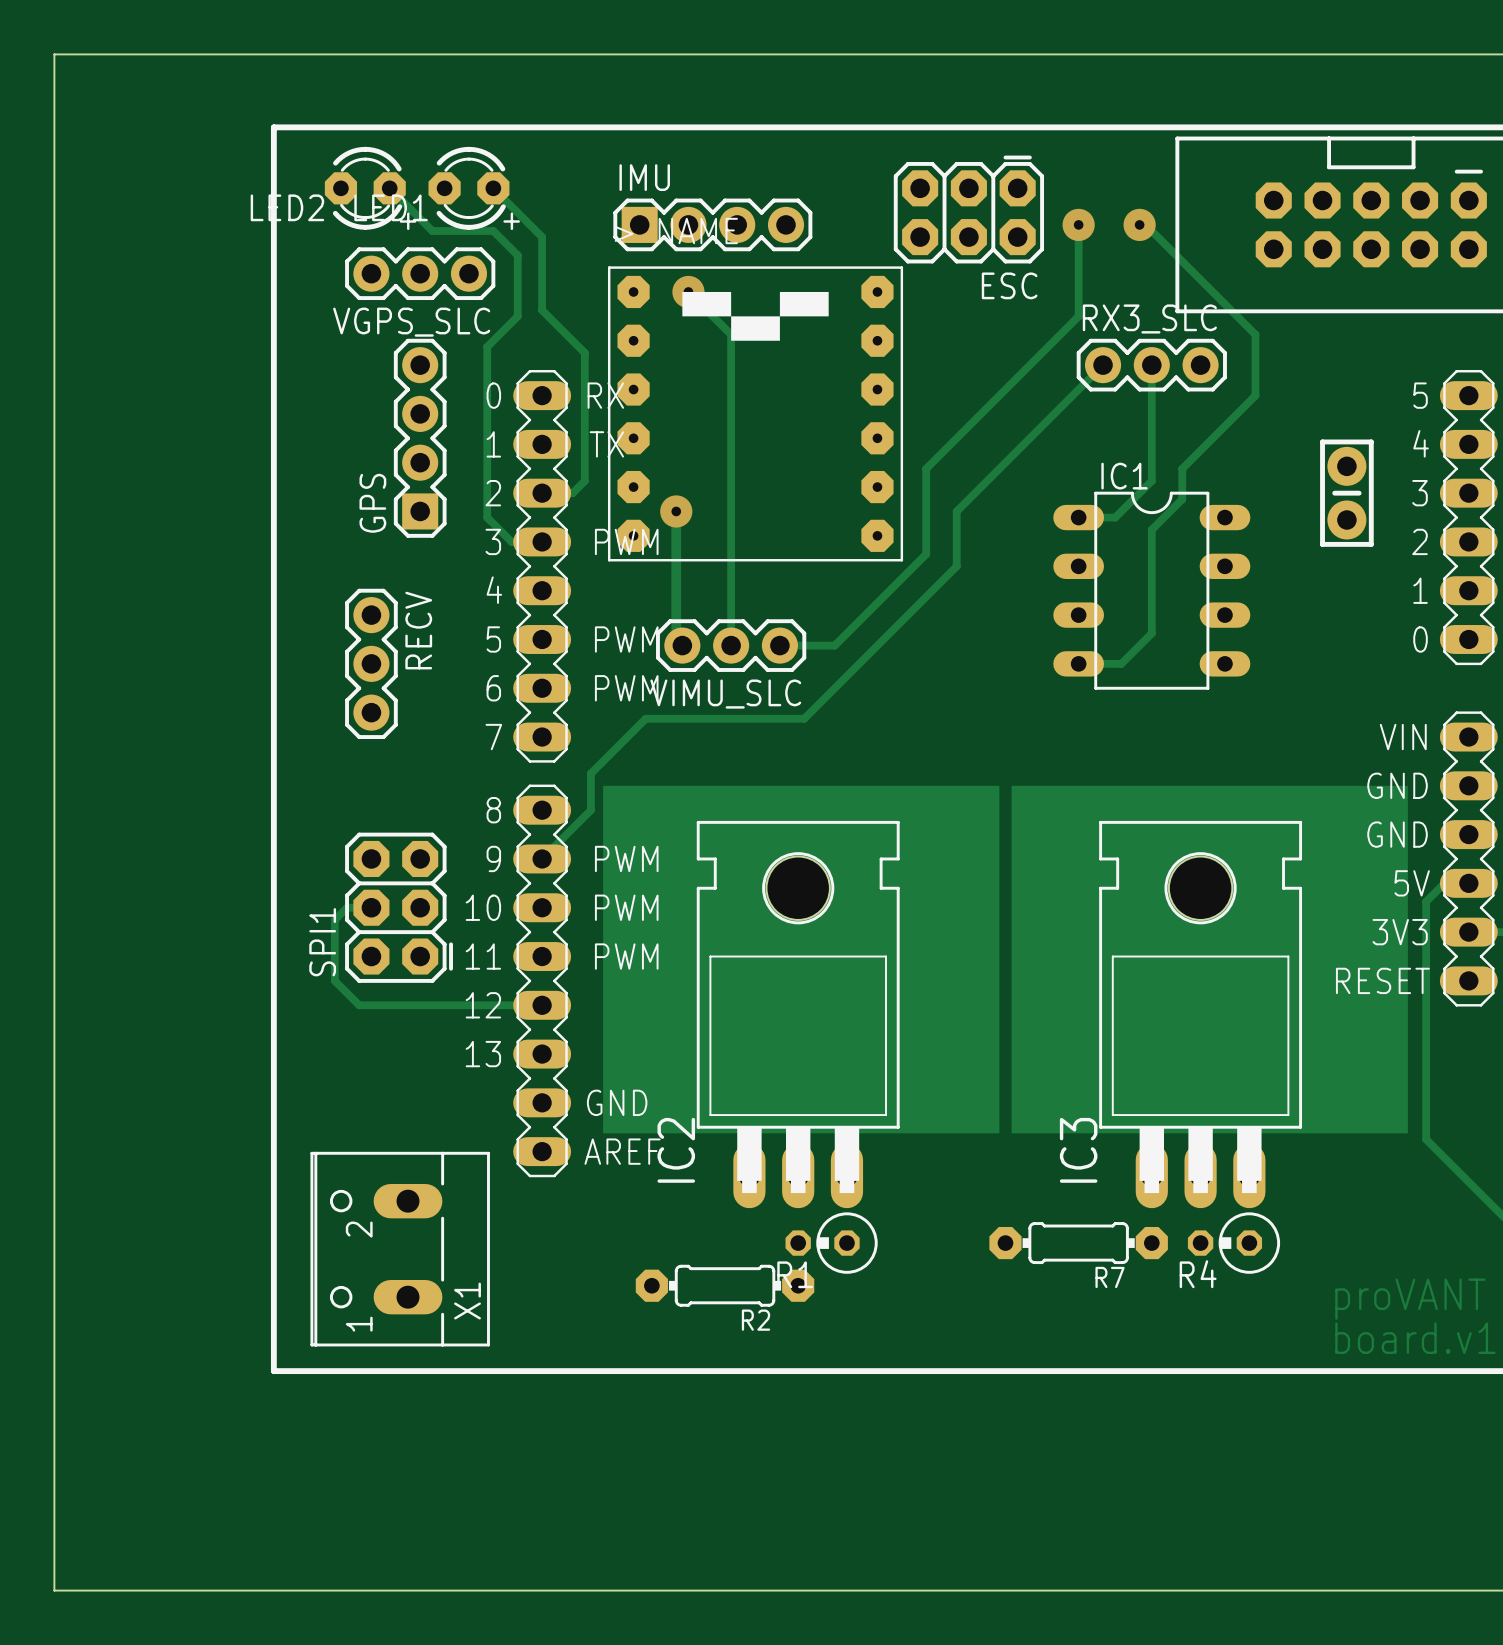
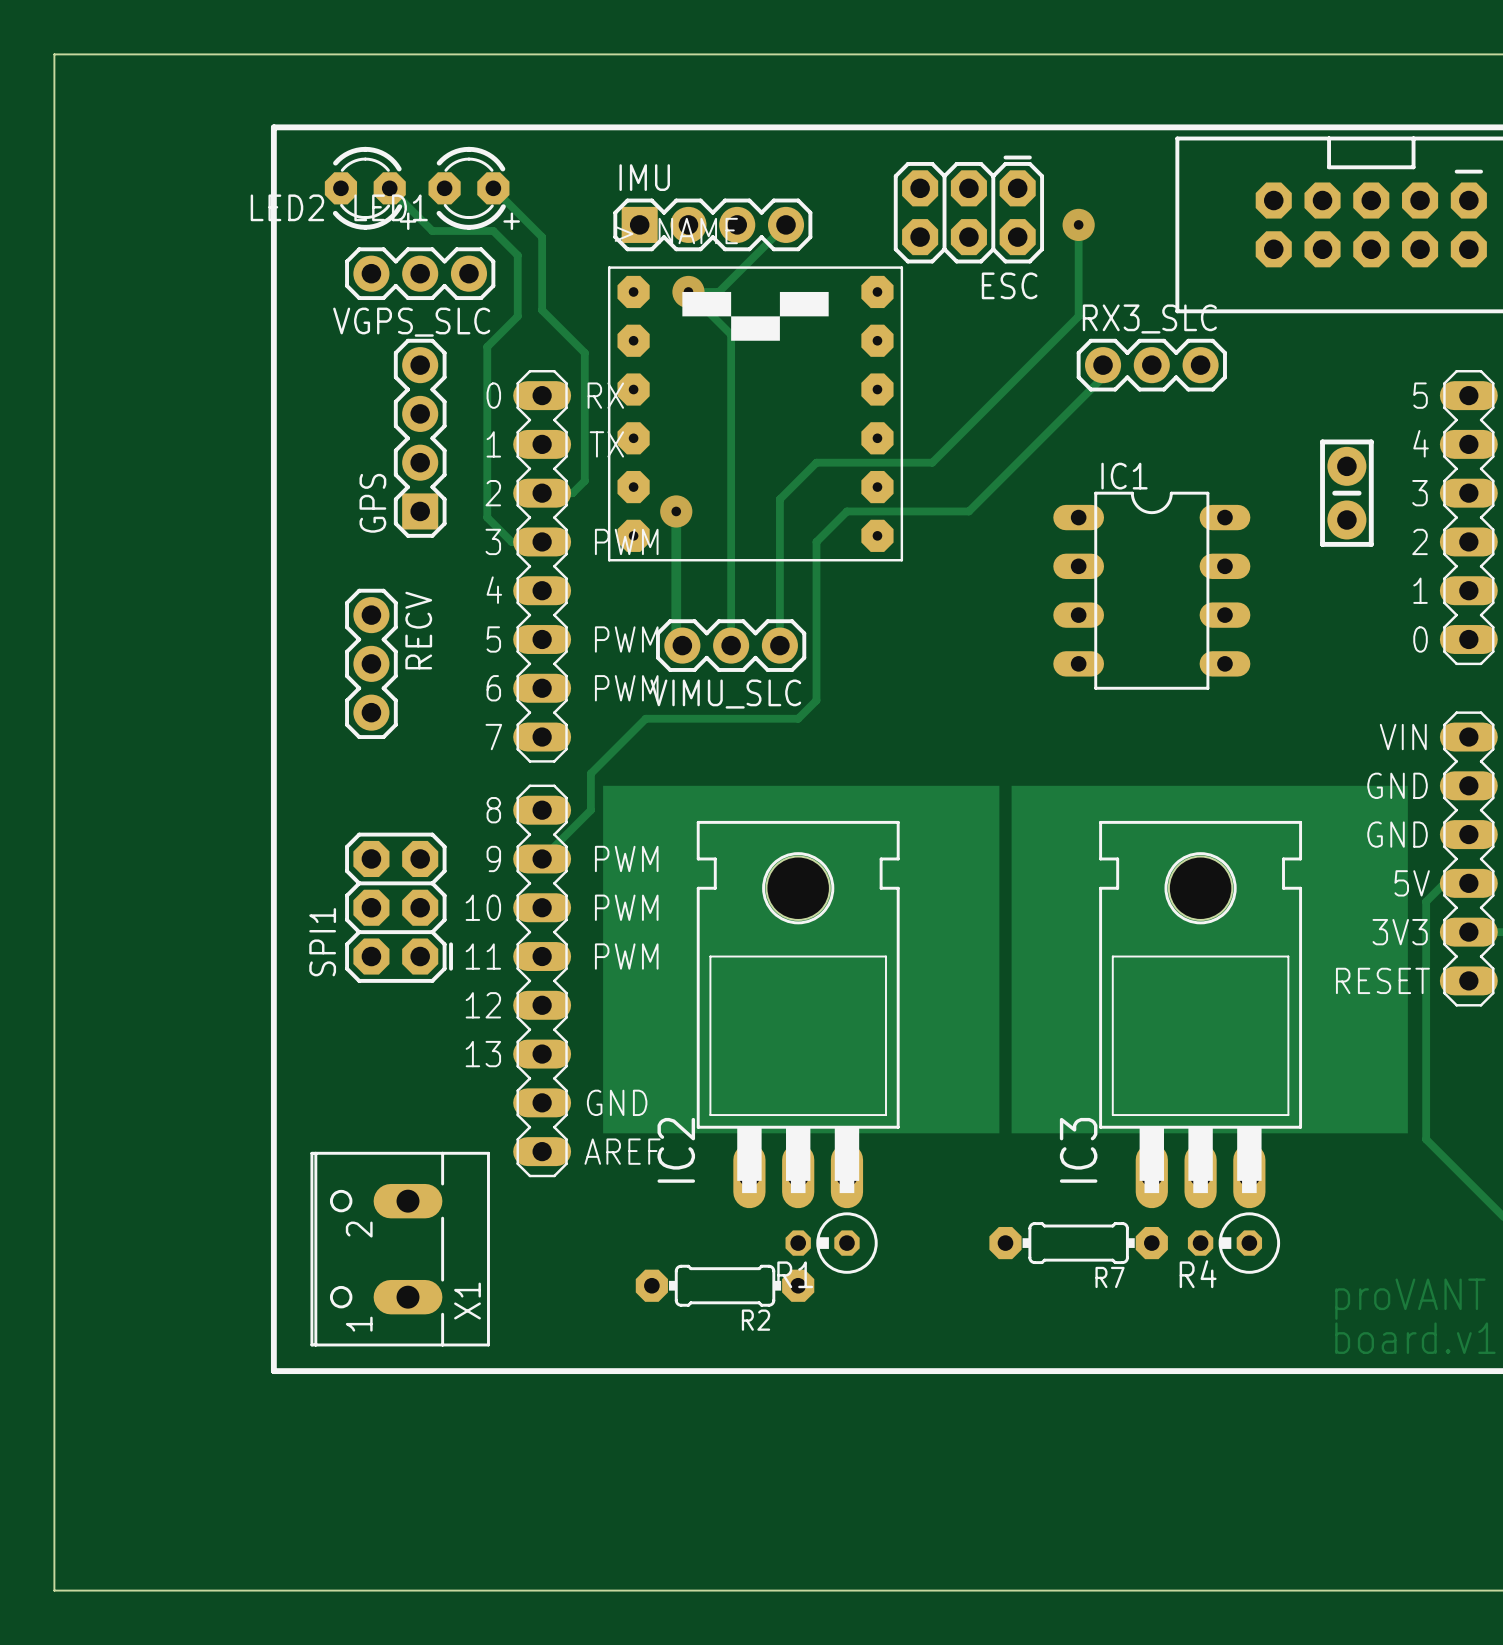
track: none -> (786, 224) (718, 291) (688, 291)
track: (1139, 224) (1145, 224) (1255, 334) (1255, 395) (1182, 468) (1182, 499) (1151, 529) (1151, 633) (1121, 663) (1078, 663) -> none
via: (1139, 224) -> none
track: (1103, 365) (956, 511) (956, 566) (804, 718) (798, 718) -> (1103, 365) (1103, 377) (968, 511) (846, 511) (816, 541) (816, 700) (798, 718)
track: (1151, 365) (1151, 480) (1115, 517) (1078, 517) -> none
track: (932, 462) (926, 468) (926, 554) (834, 645) (779, 645) -> (932, 462) (816, 462) (779, 499) (779, 645)
track: (371, 907) (347, 907) (334, 919) (334, 980) (359, 1005) (542, 1005) -> none

